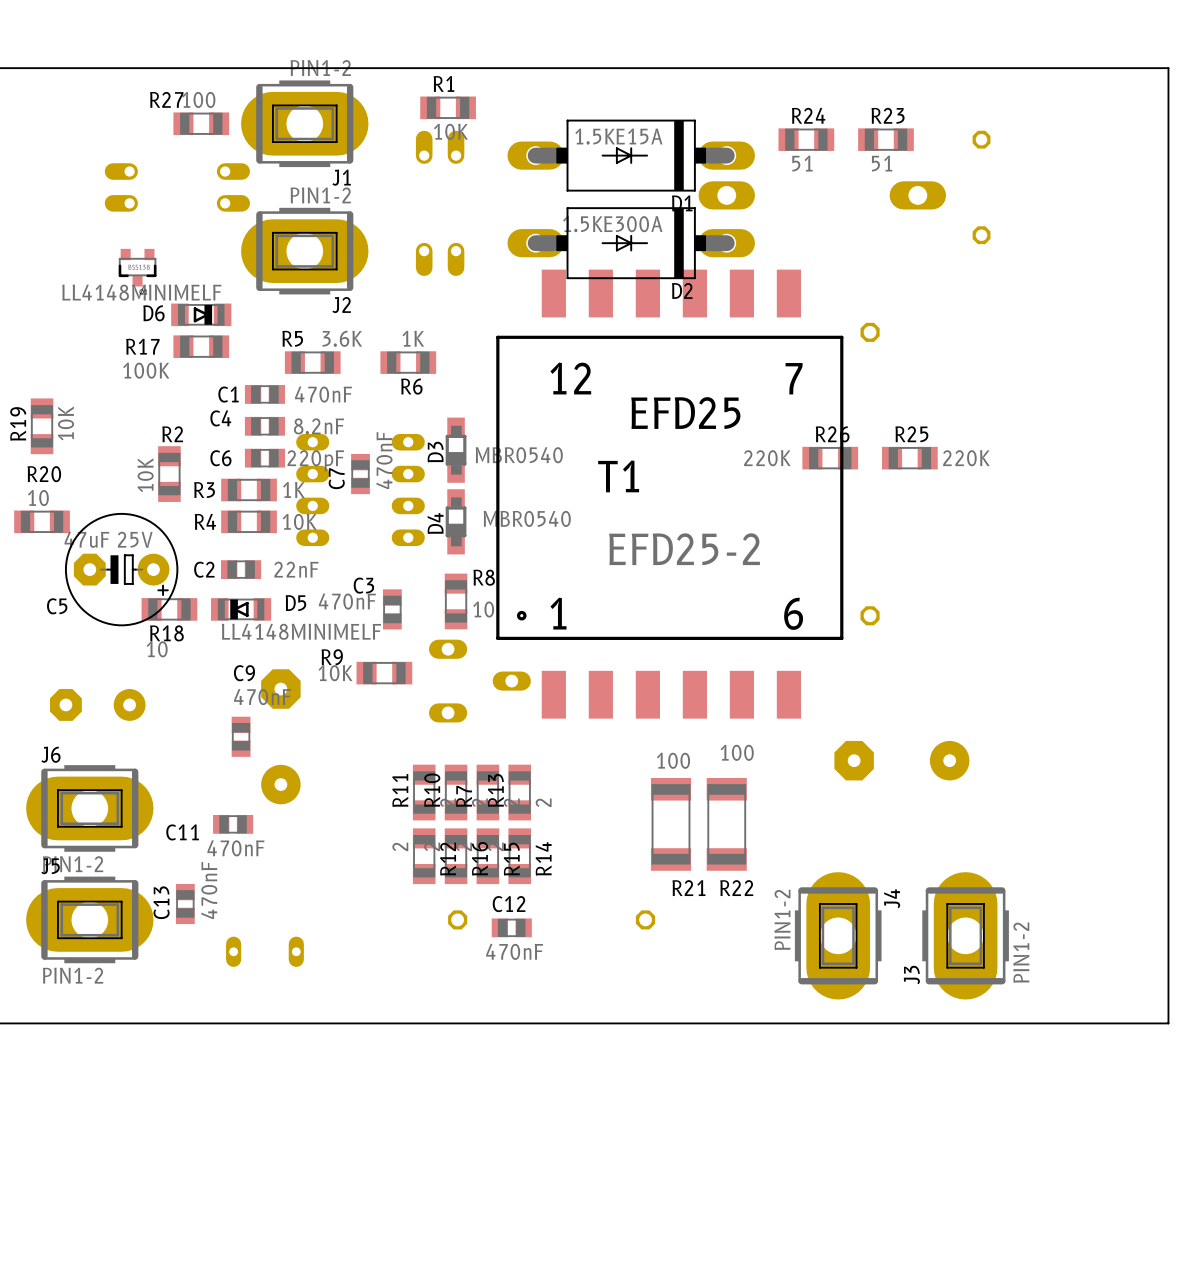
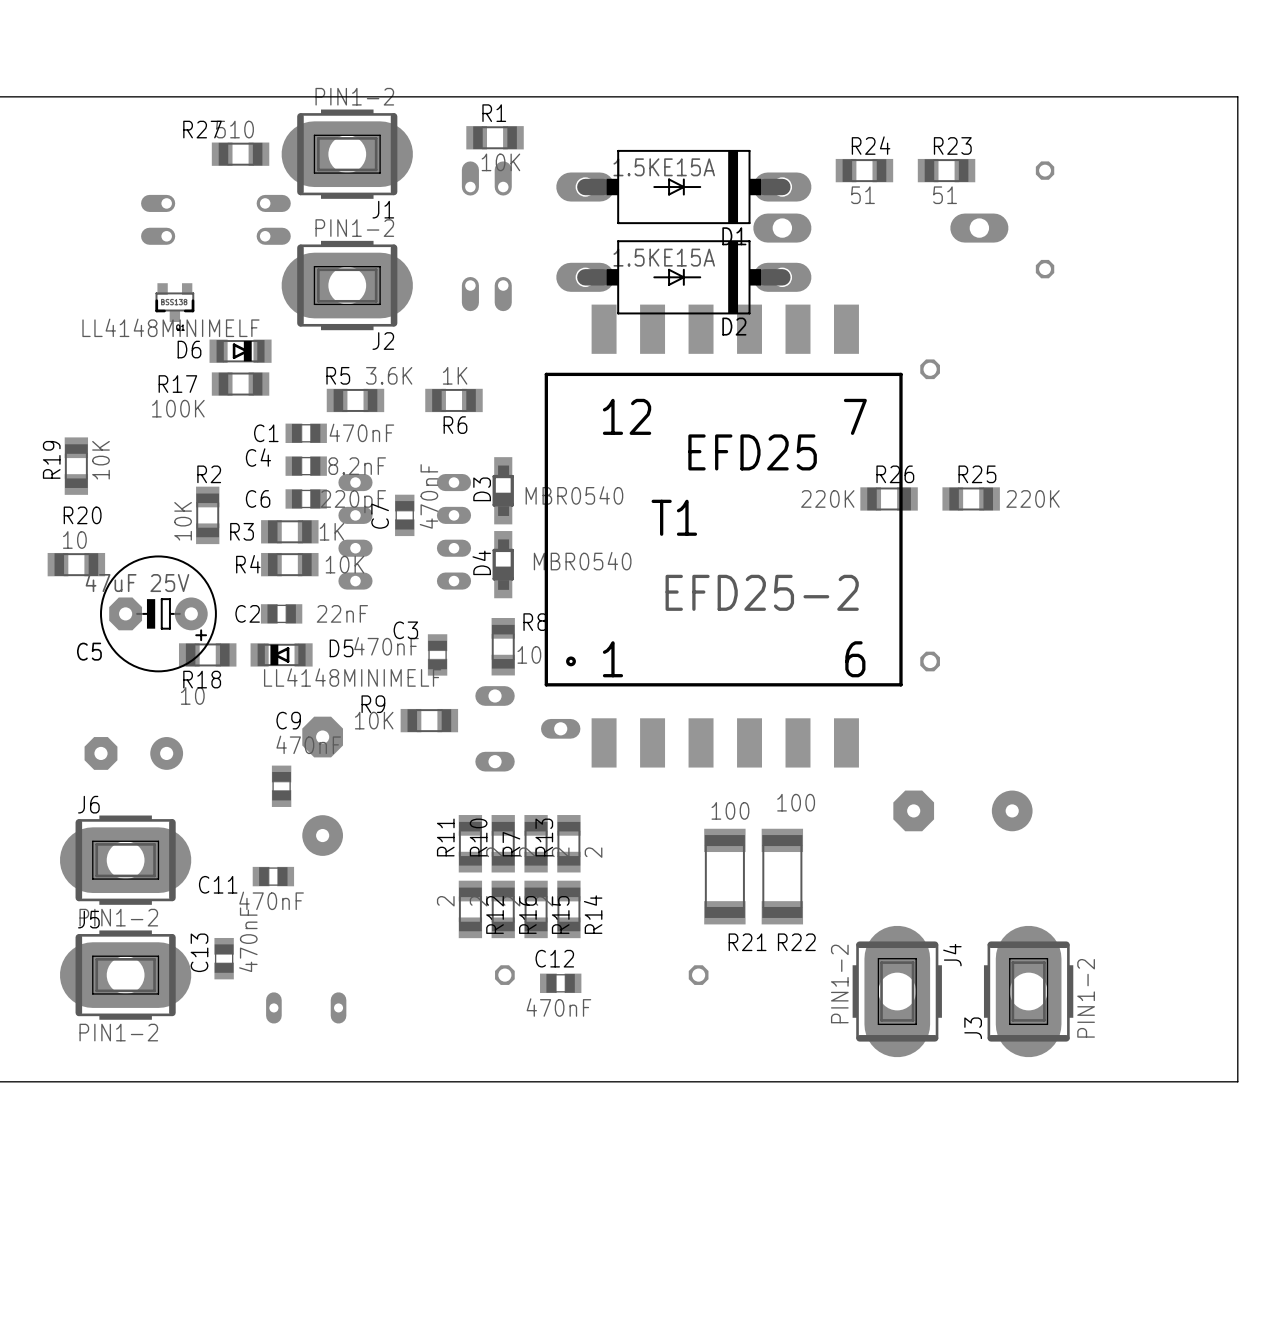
R27 value: 100 (198, 99) -> 510 (234, 129)
D2 value: 1.5KE300A (612, 224) -> 1.5KE15A (664, 257)

